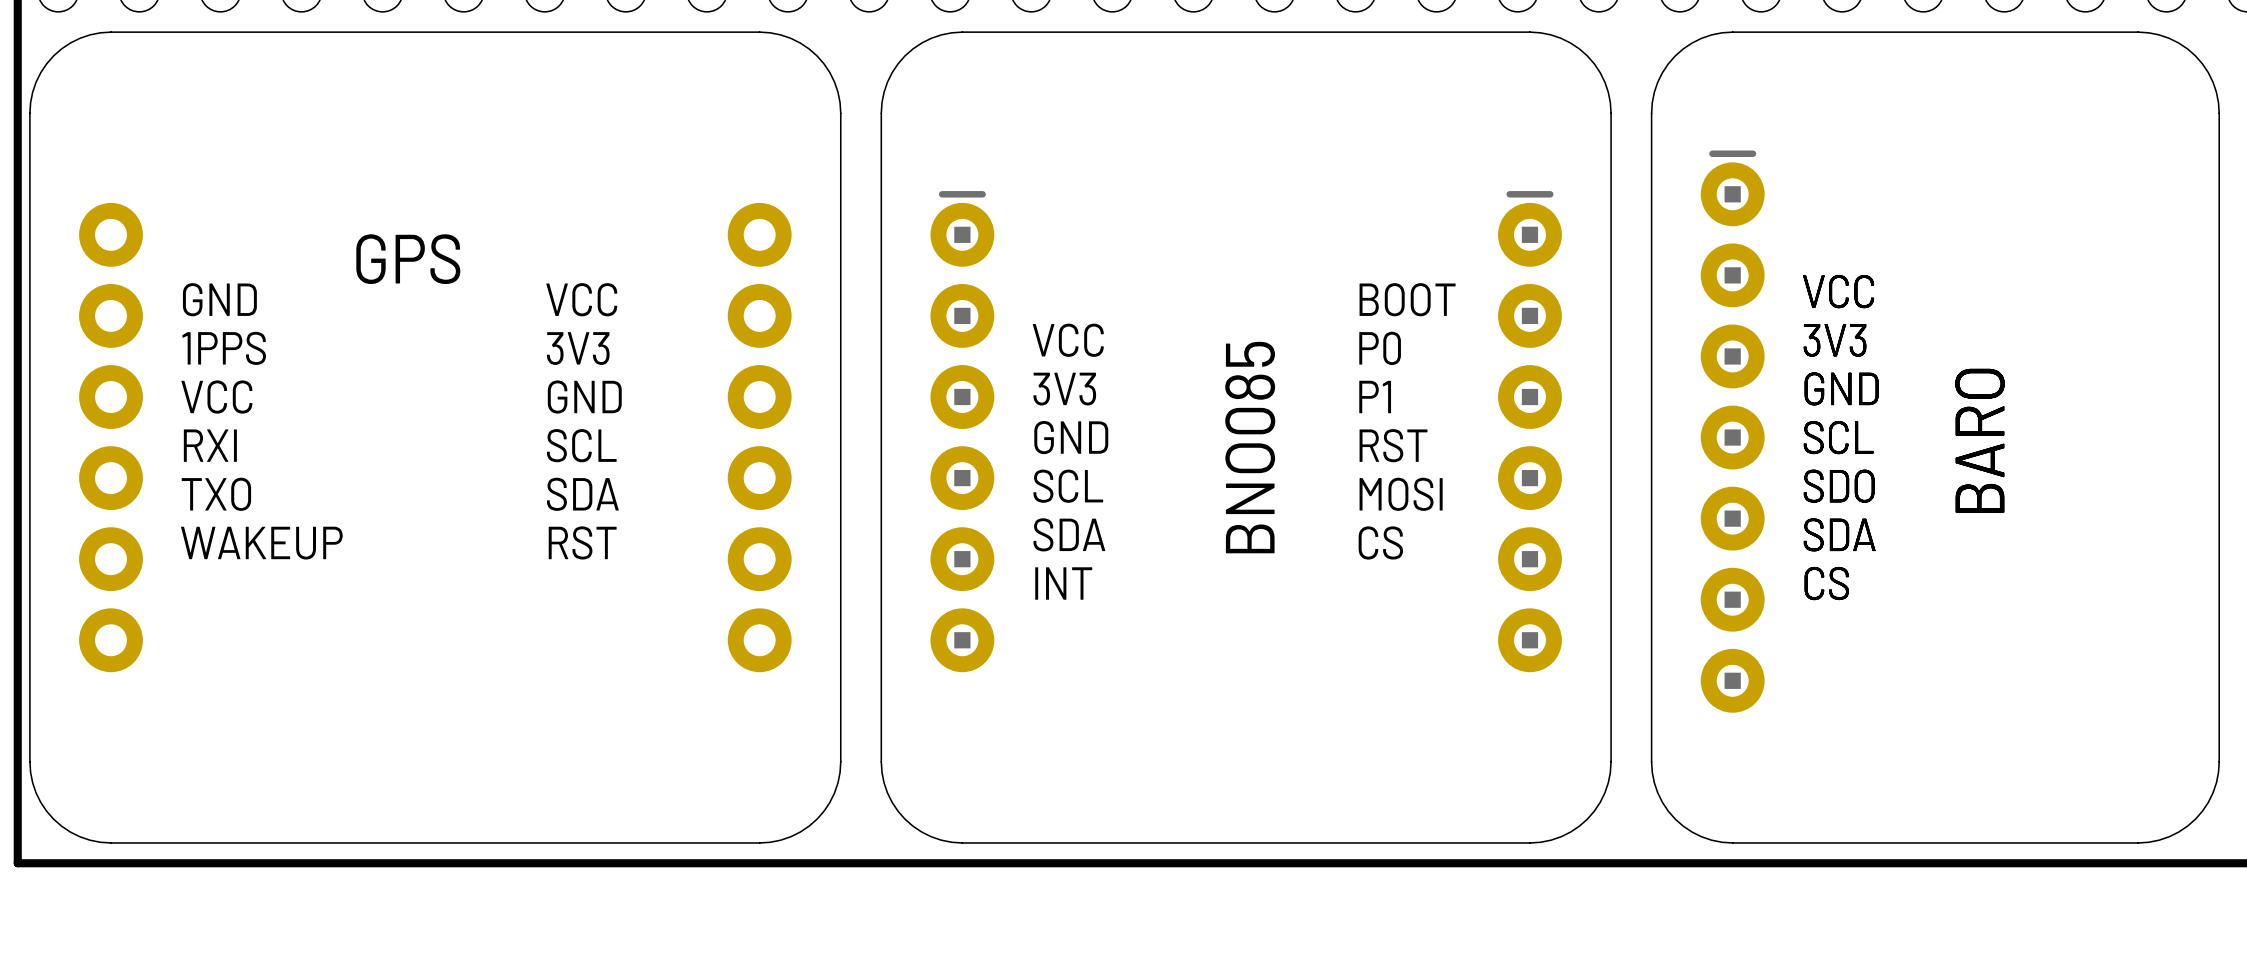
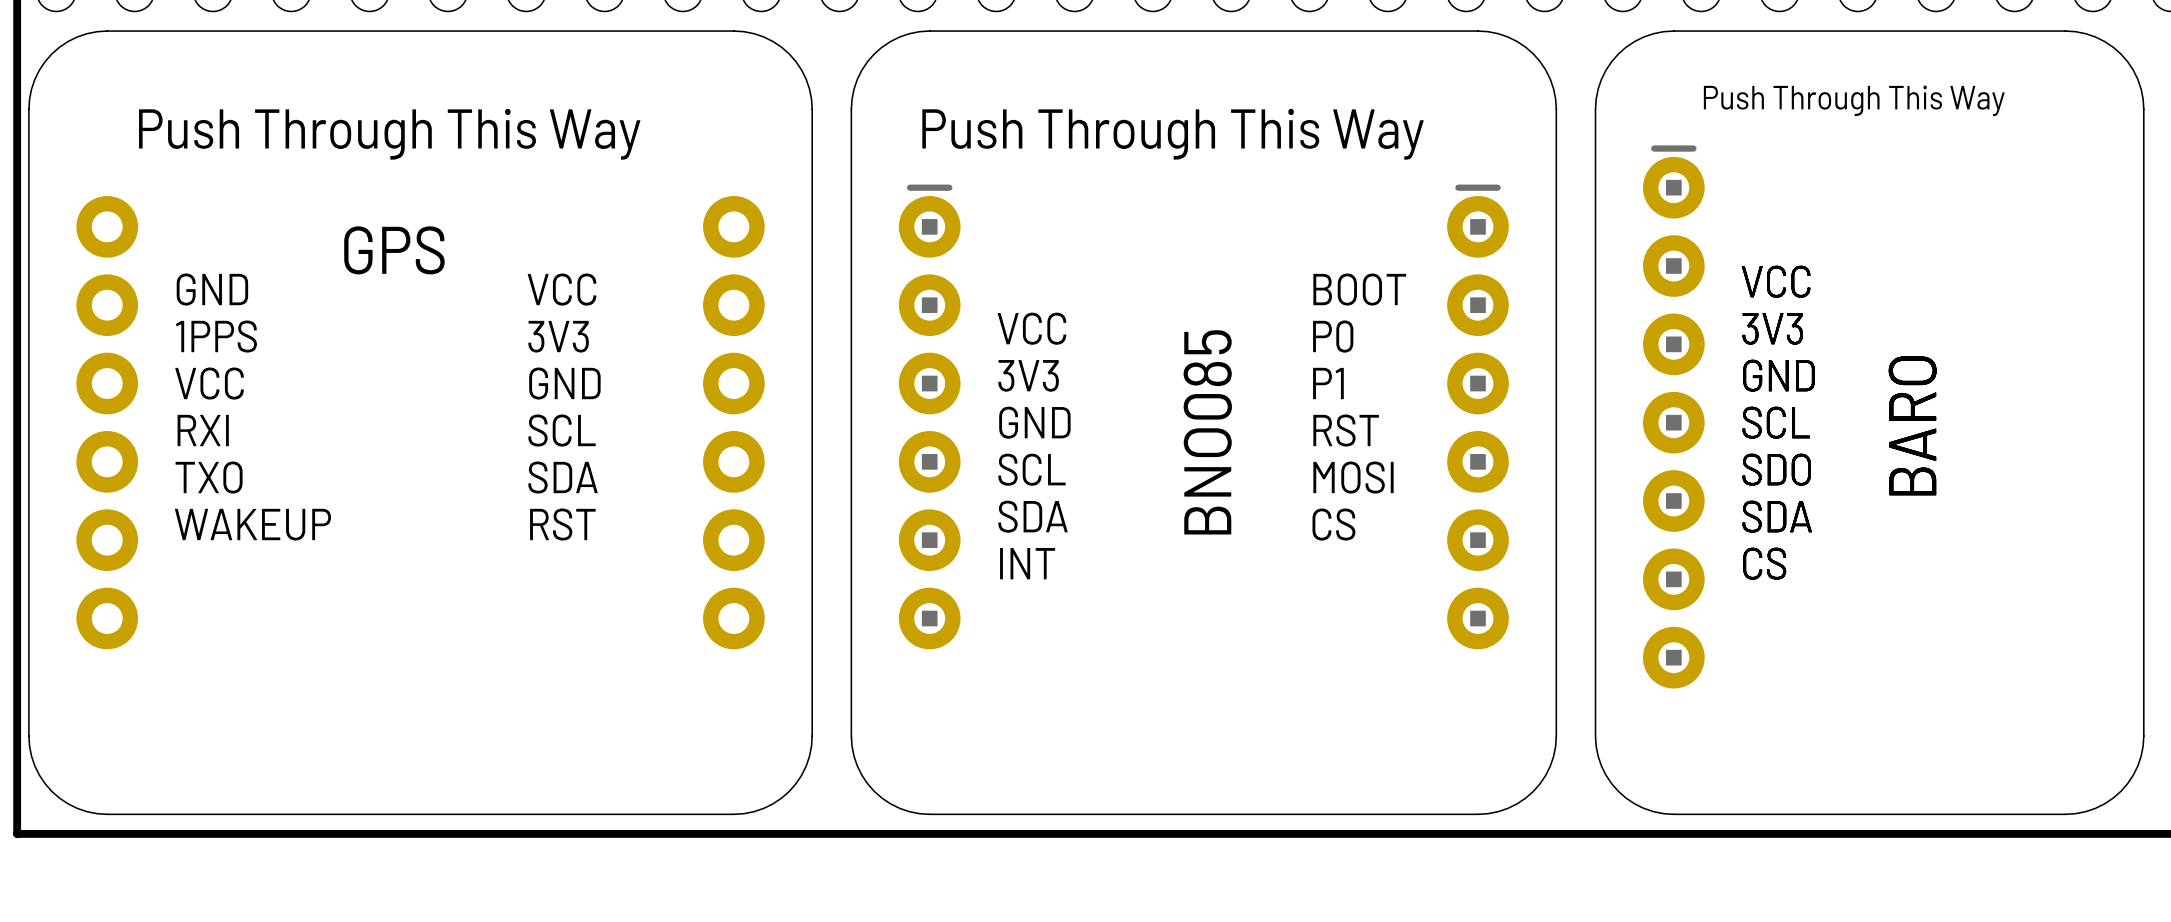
text: none -> Push Through This Way (1854, 100)
text: none -> Push Through This Way (389, 134)
text: none -> Push Through This Way (1173, 134)

